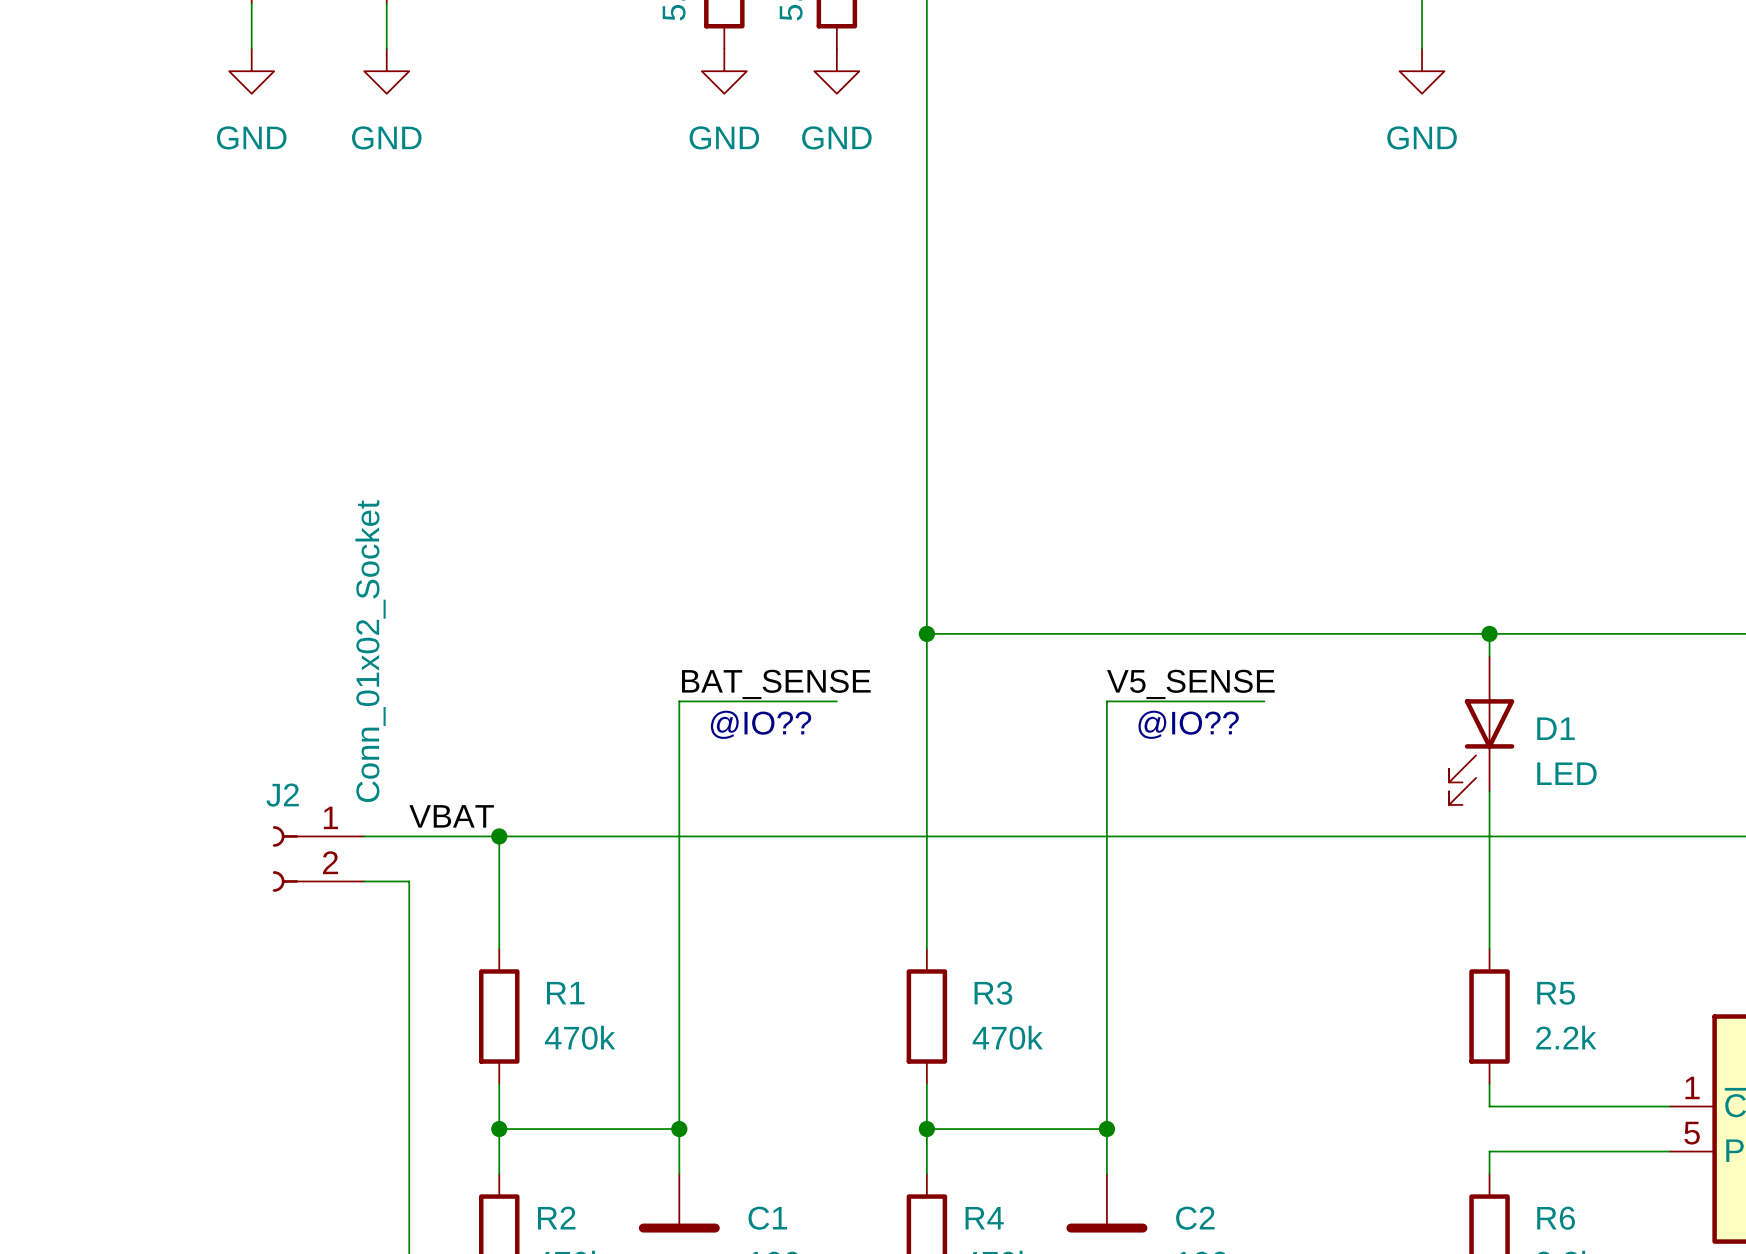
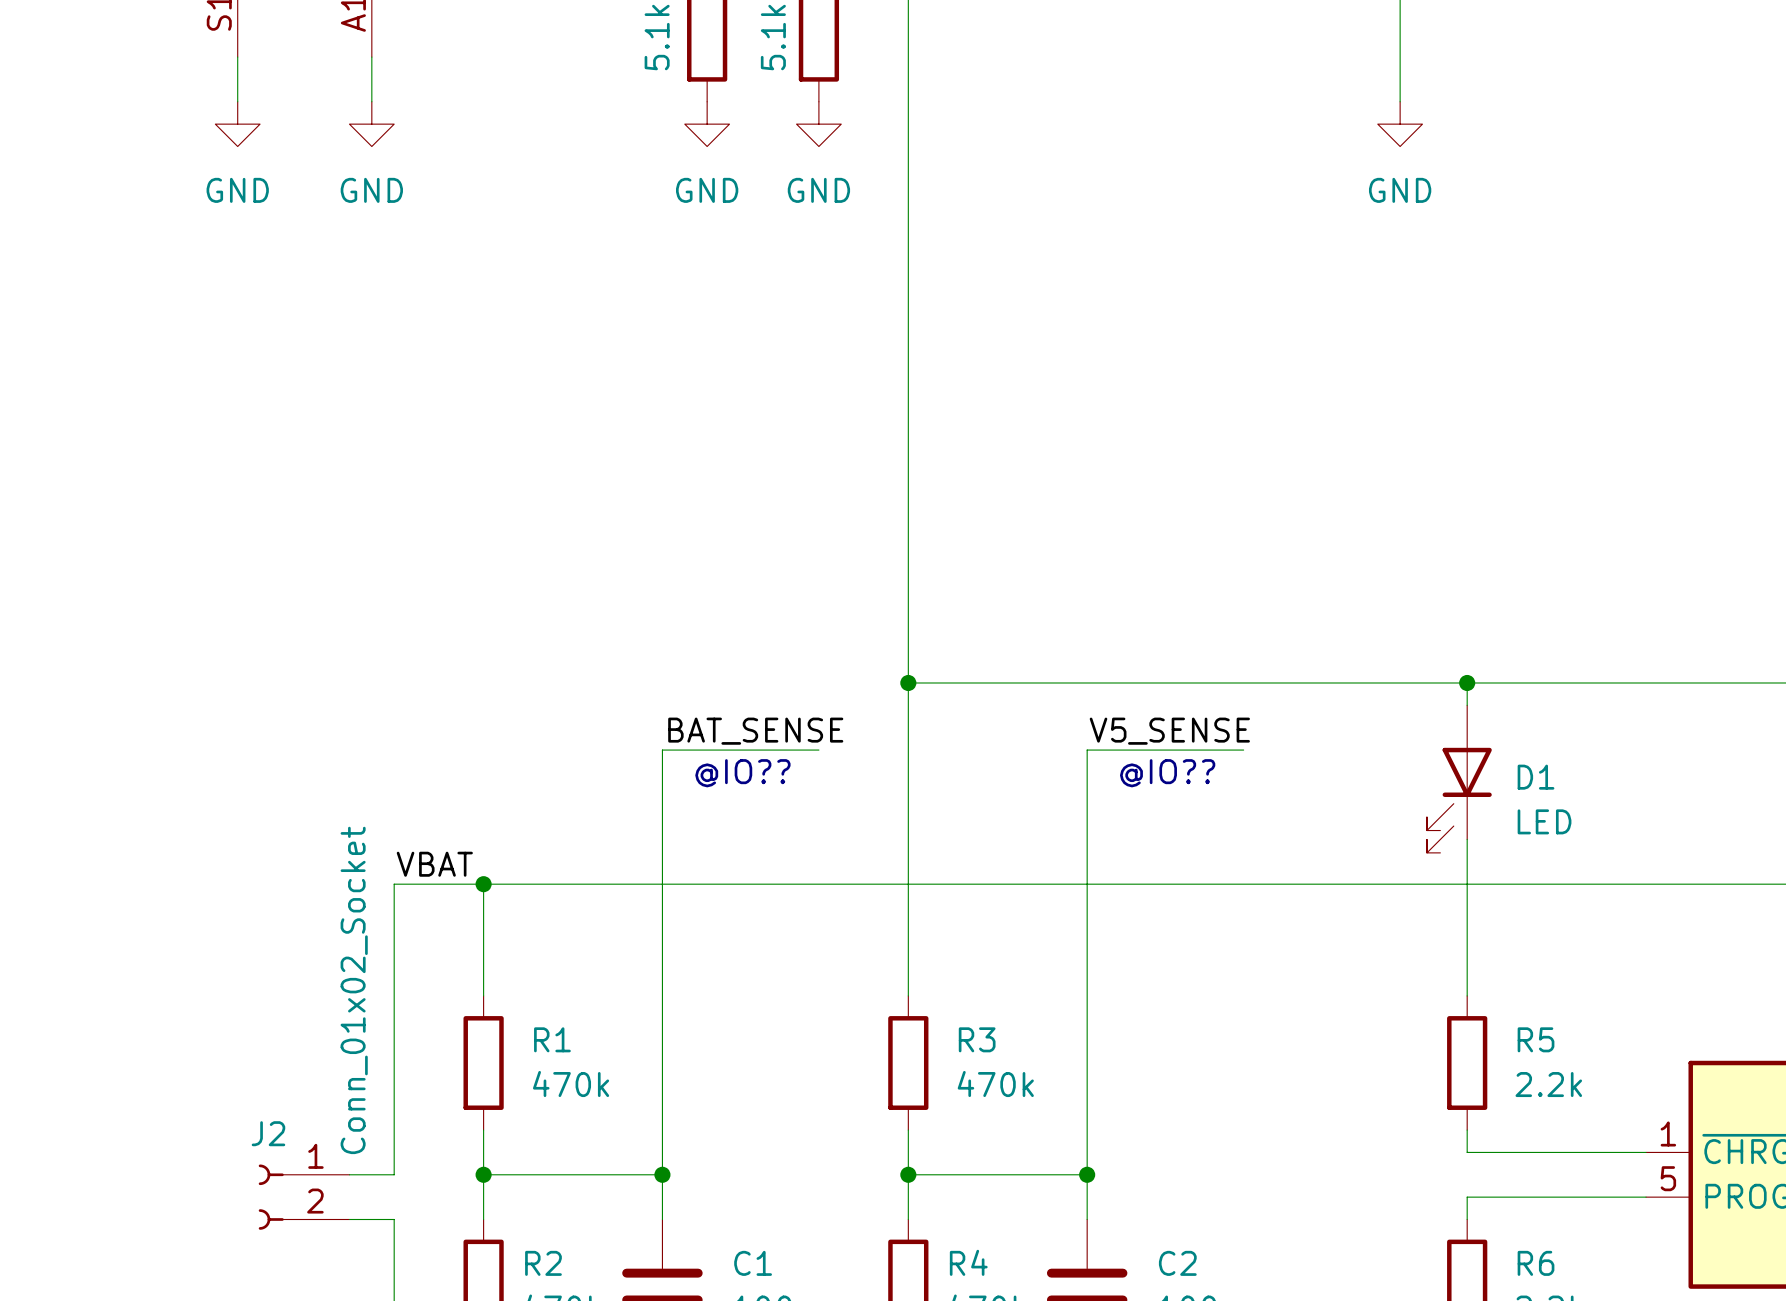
wire: (364, 836) (409, 836) -> (394, 928) (394, 884)
J2 position: (318, 858) -> (304, 1197)
wire: (364, 881) (409, 881) -> (349, 1219) (394, 1219)
wire: (409, 1129) (409, 1174) -> (394, 1174) (349, 1174)

